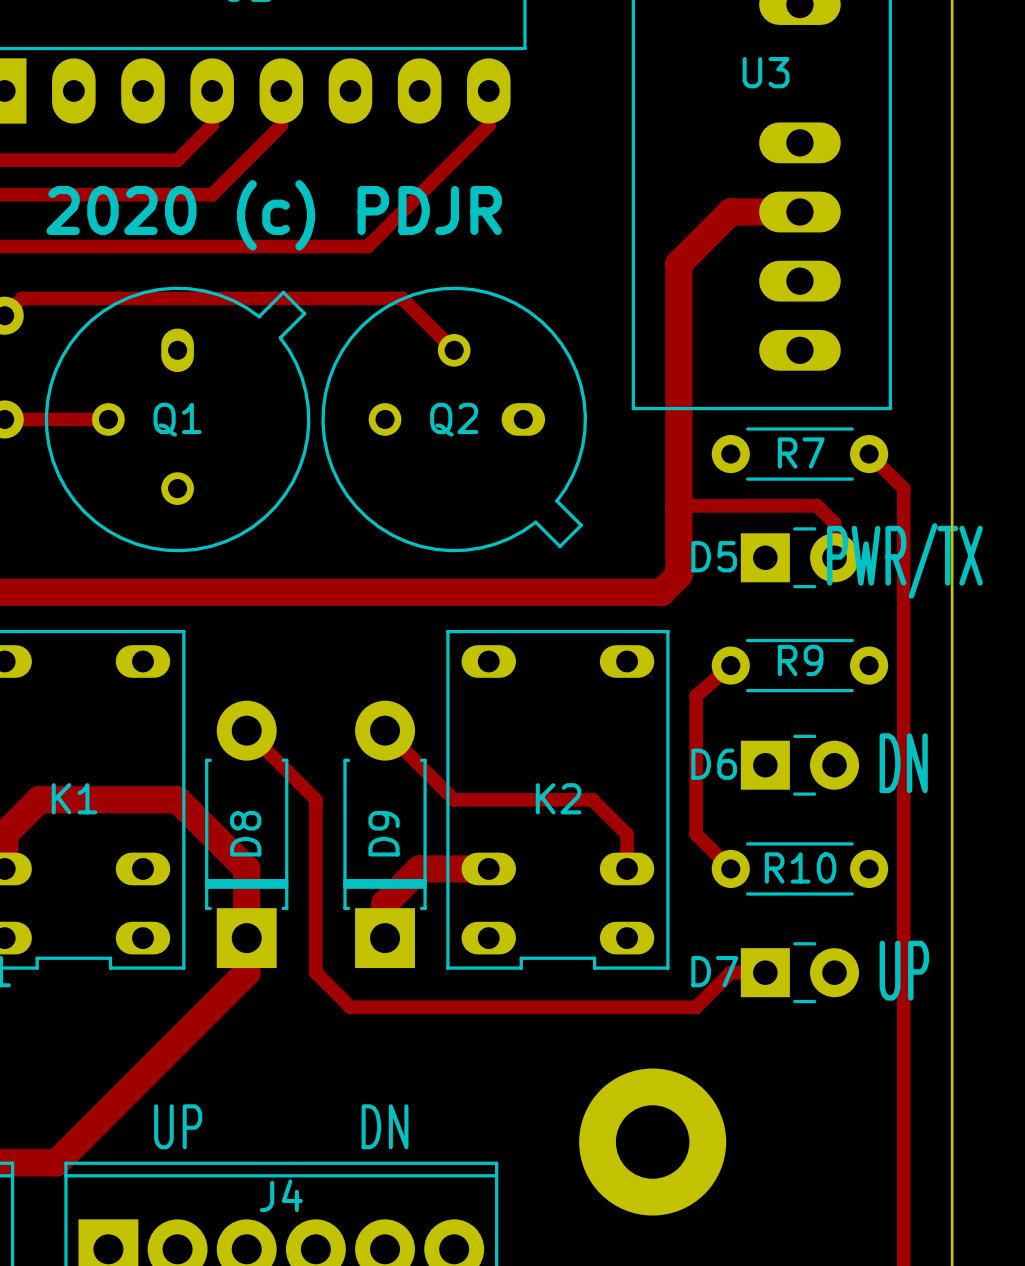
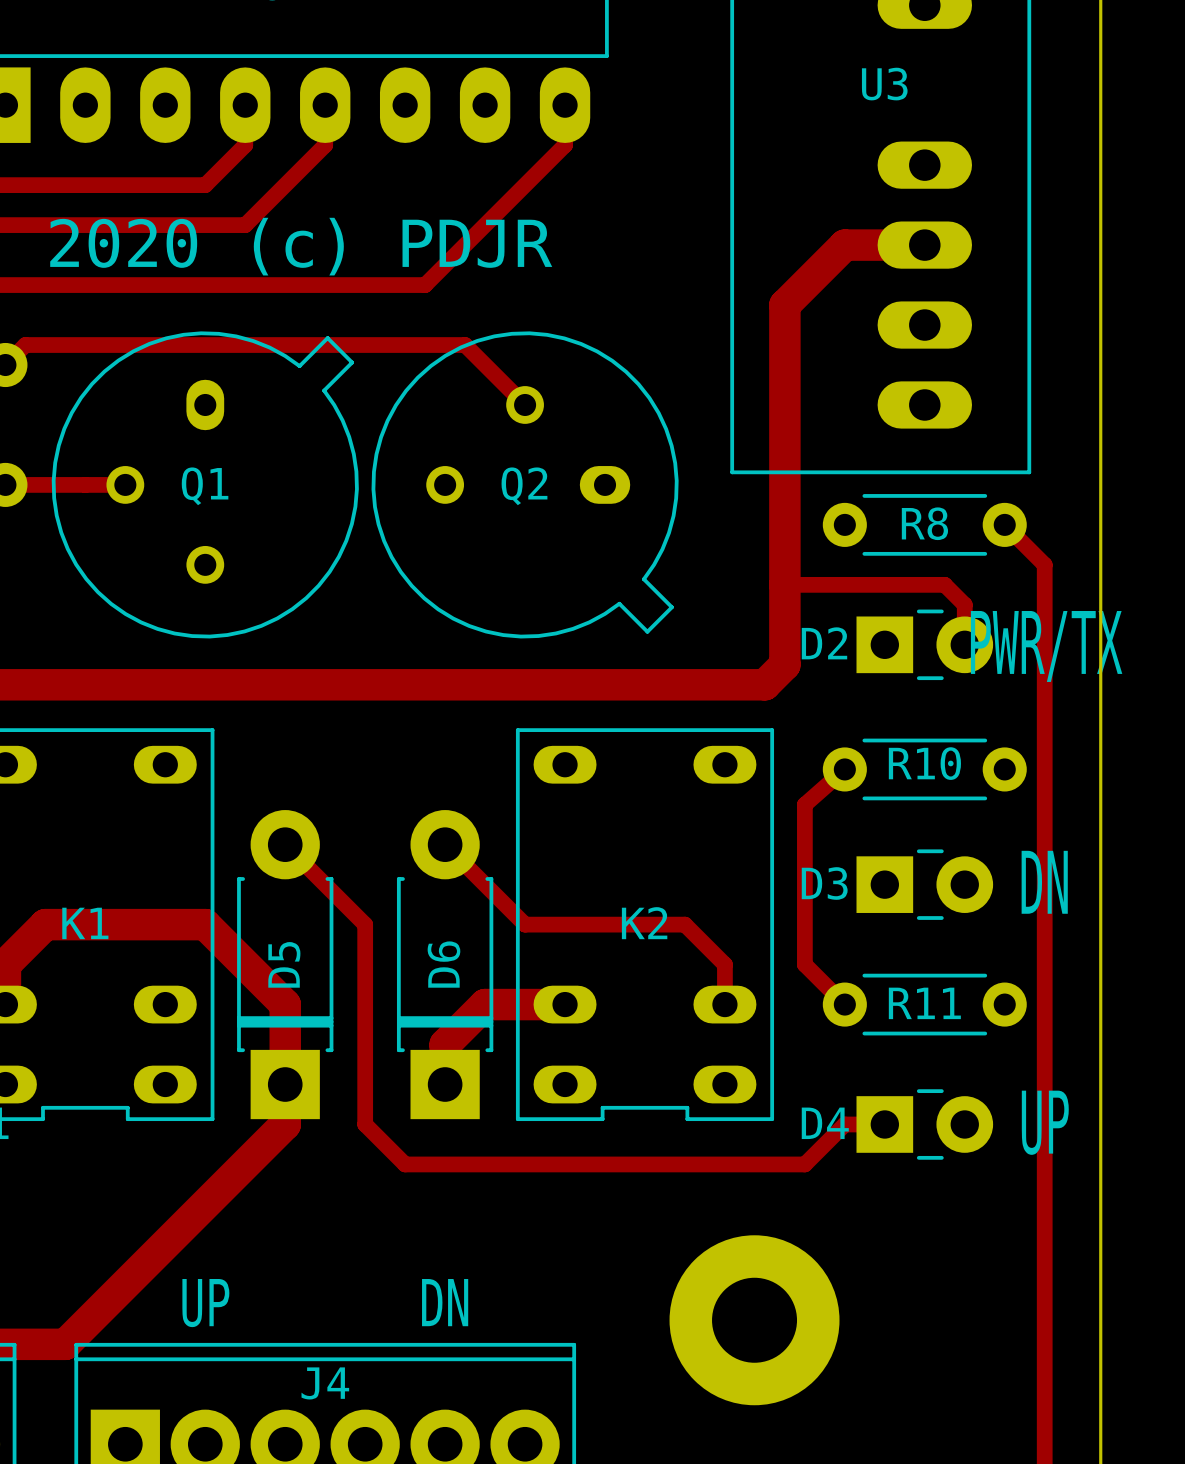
R7 name: R7 (801, 453) -> R8 (924, 523)
D5 name: D5 (714, 556) -> D2 (824, 643)
R9 name: R9 (800, 660) -> R10 (924, 763)
D6 name: D6 (714, 764) -> D3 (824, 883)
D8 name: D8 (245, 833) -> D5 (284, 964)
D9 name: D9 (384, 833) -> D6 (443, 964)
R10 name: R10 (800, 867) -> R11 (924, 1003)
D7 name: D7 (714, 971) -> D4 (825, 1123)

